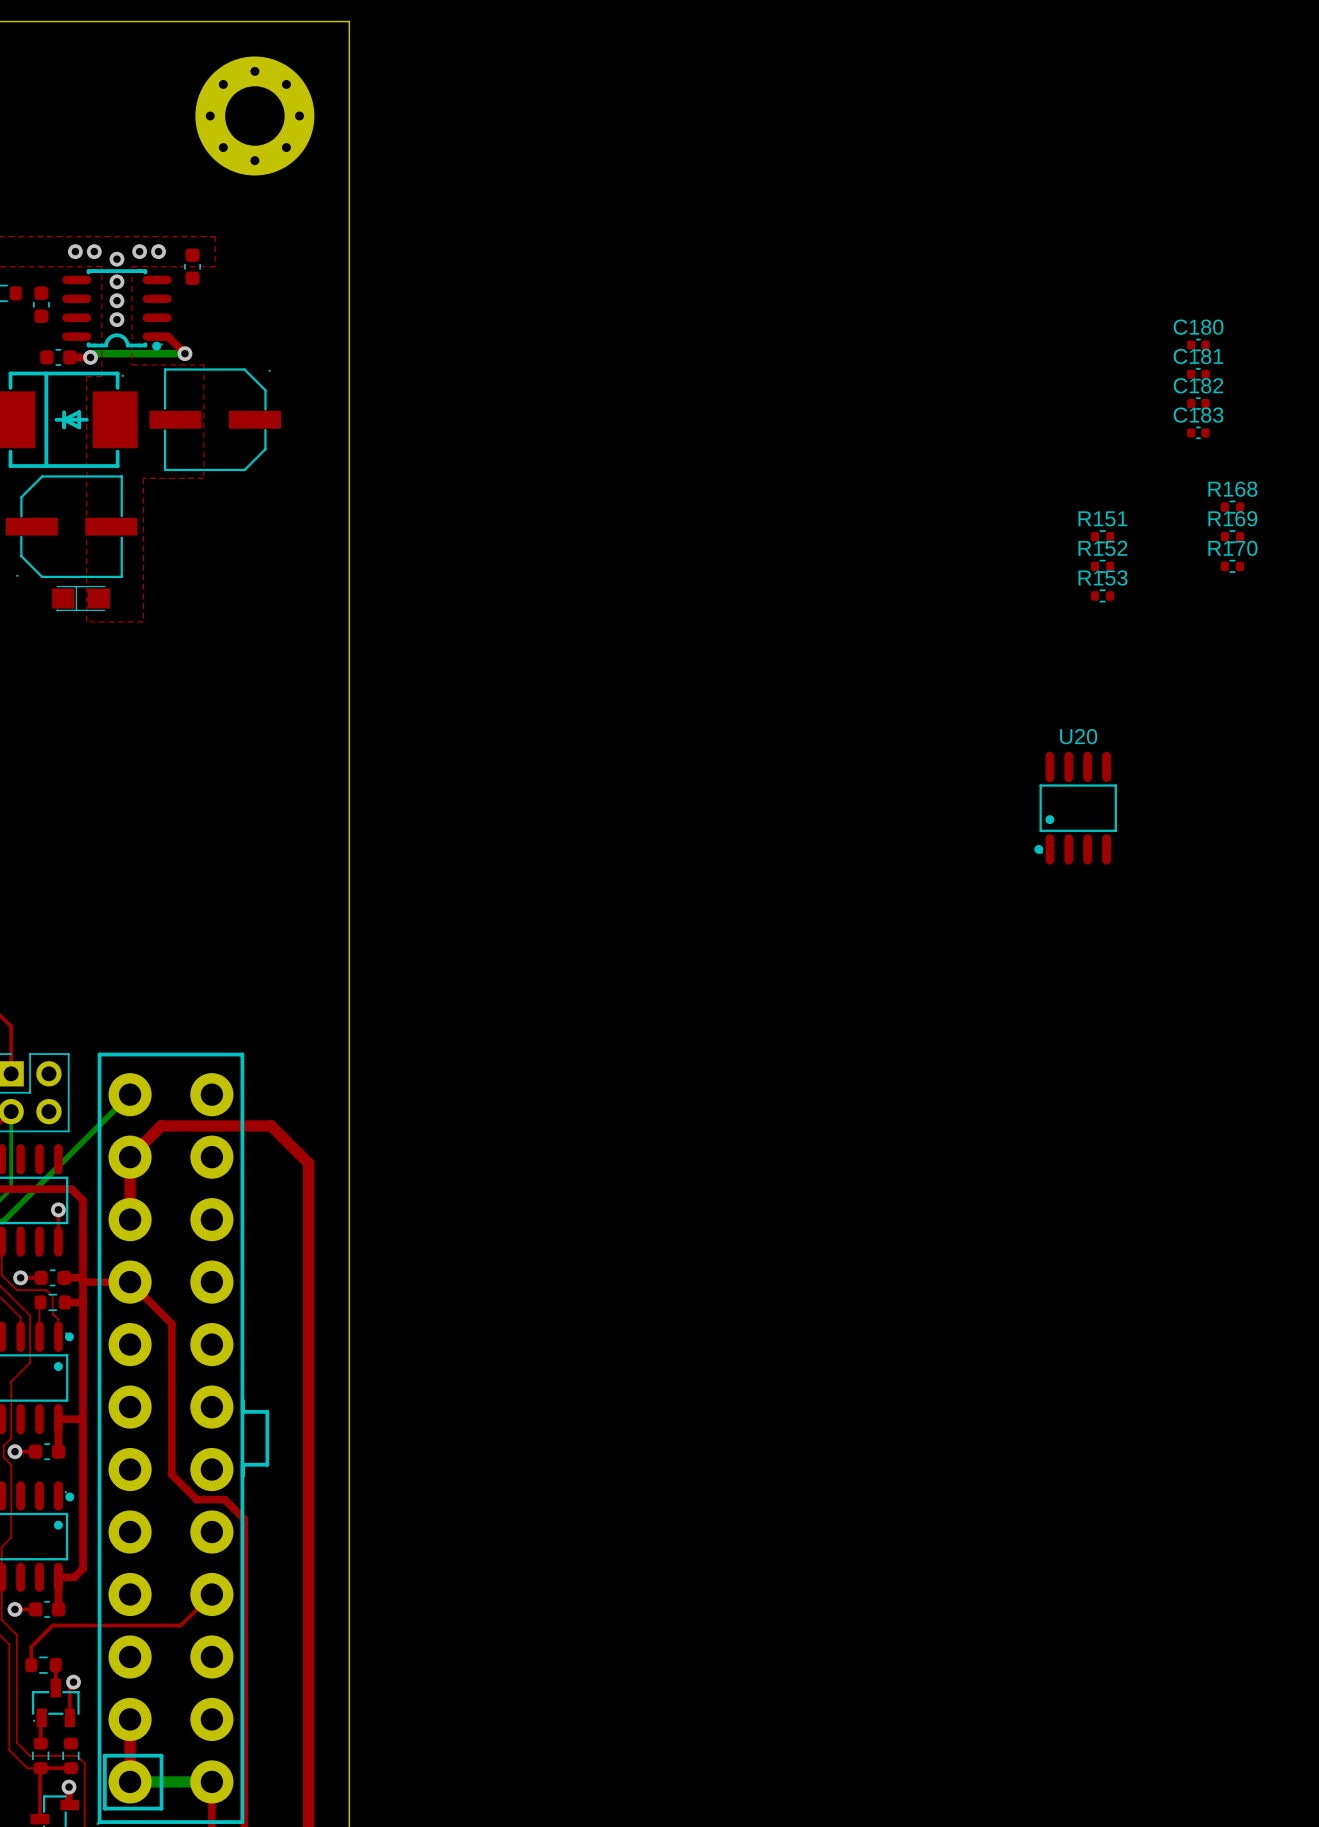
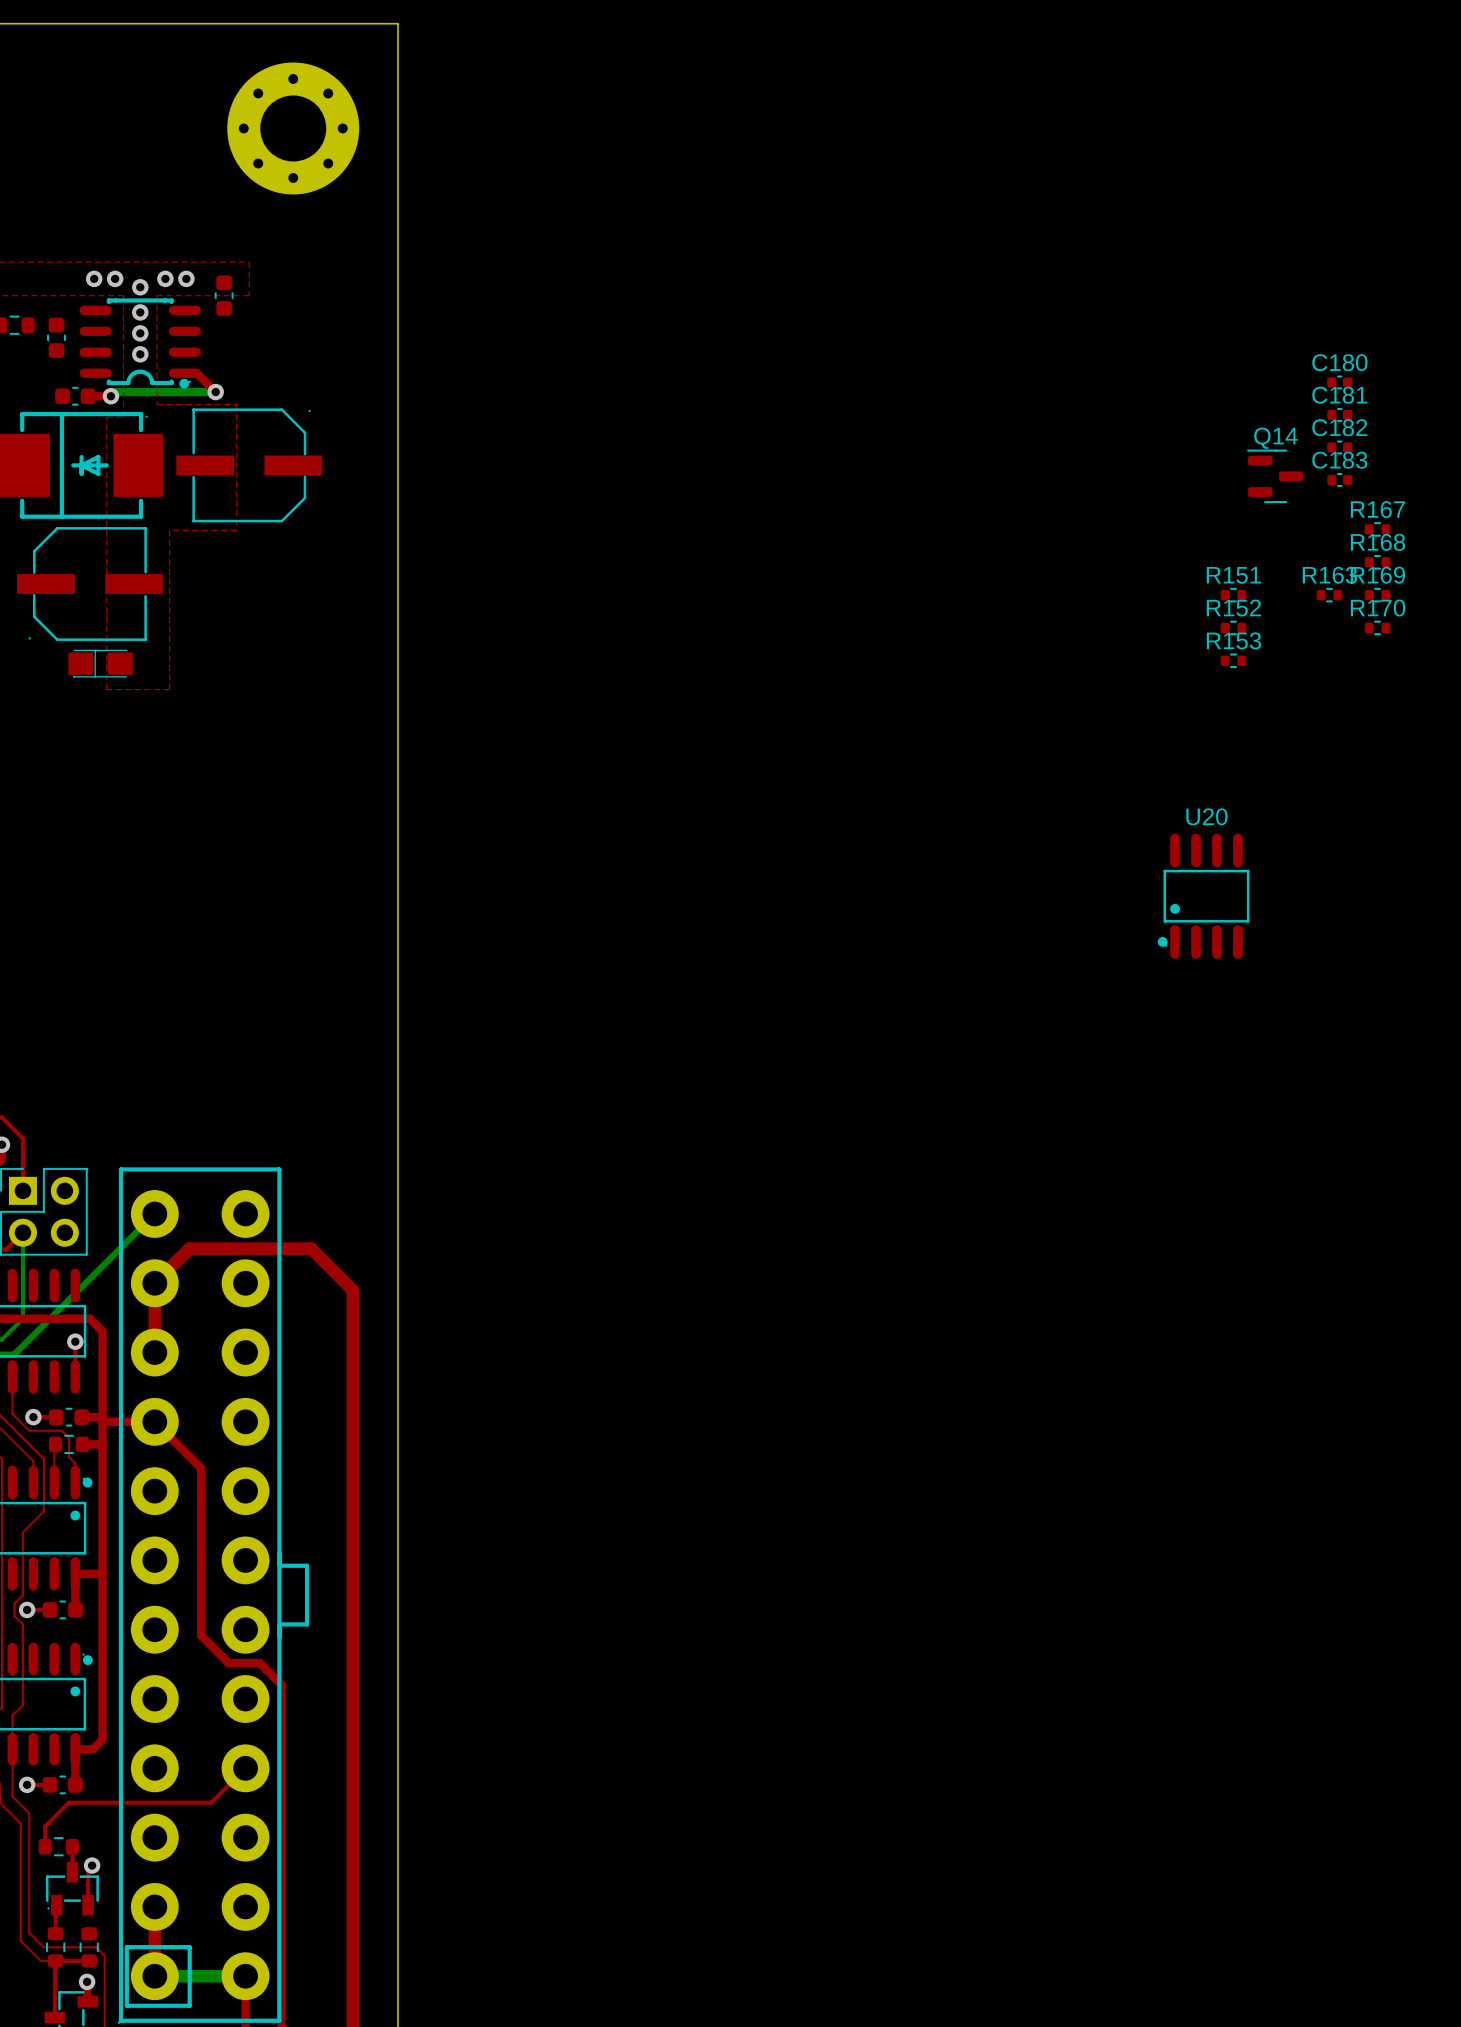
Q14: none -> (1275, 476)
R167: none -> (1377, 529)
R163: none -> (1329, 595)

